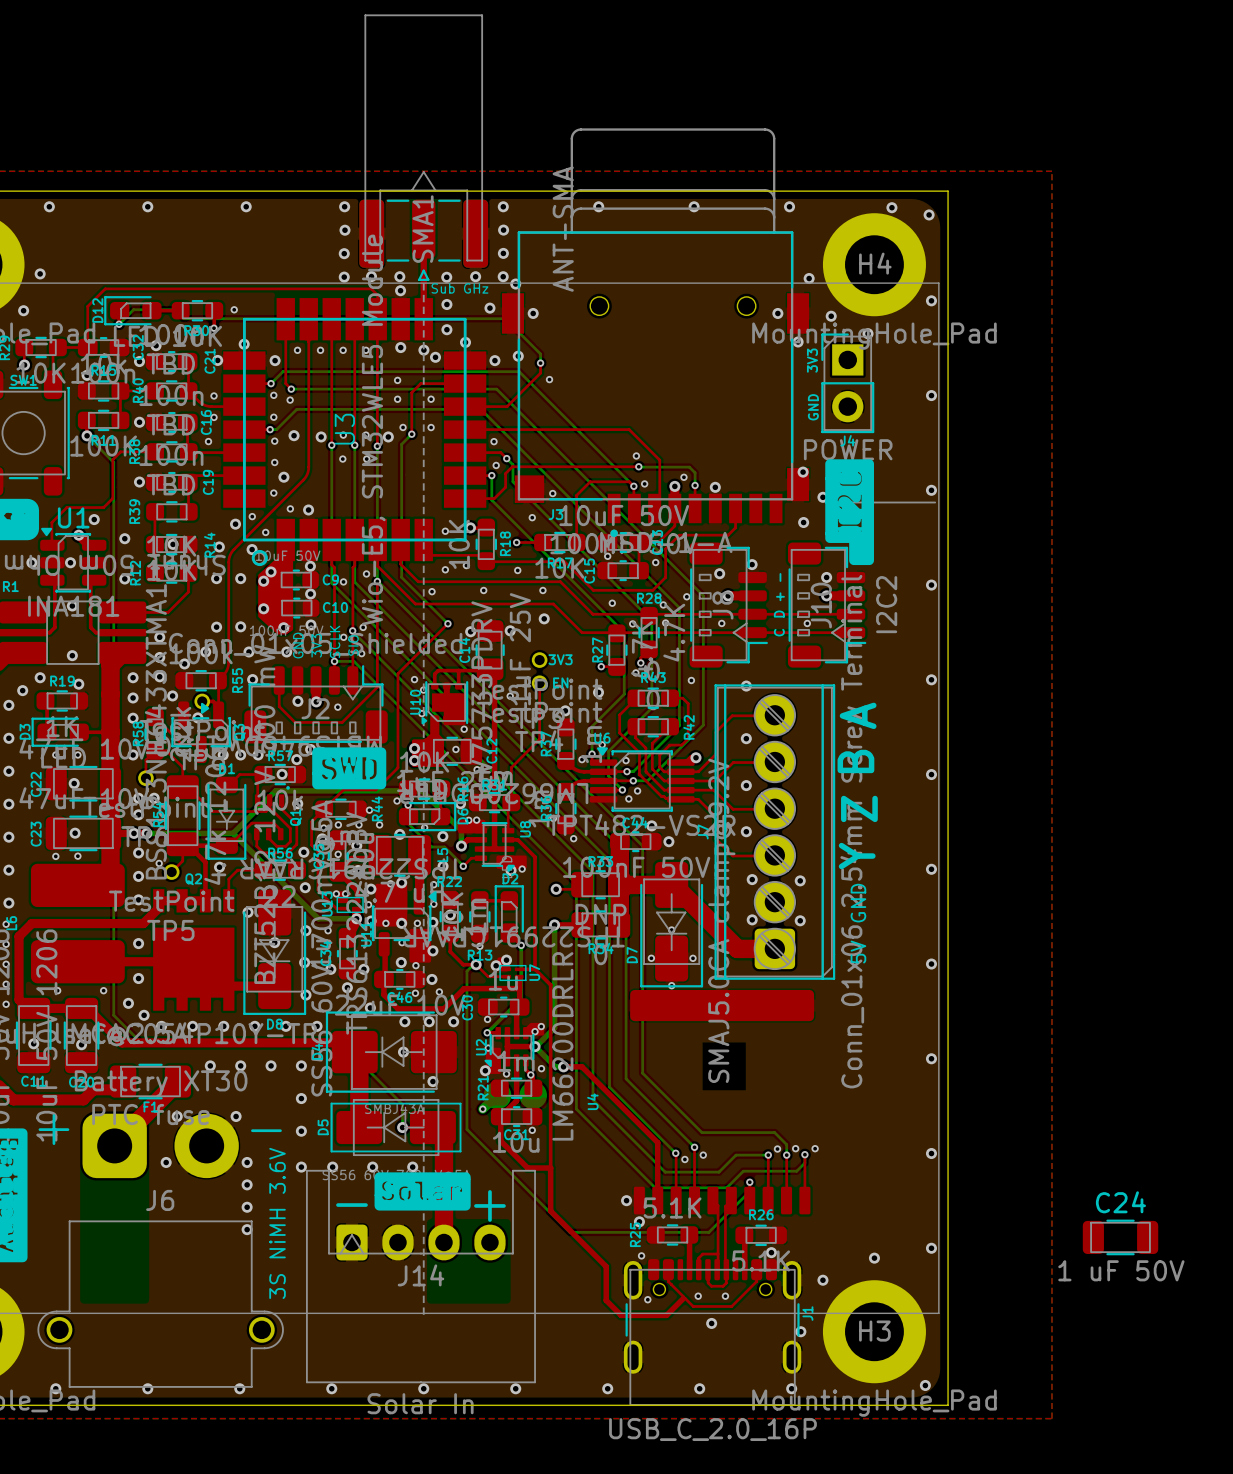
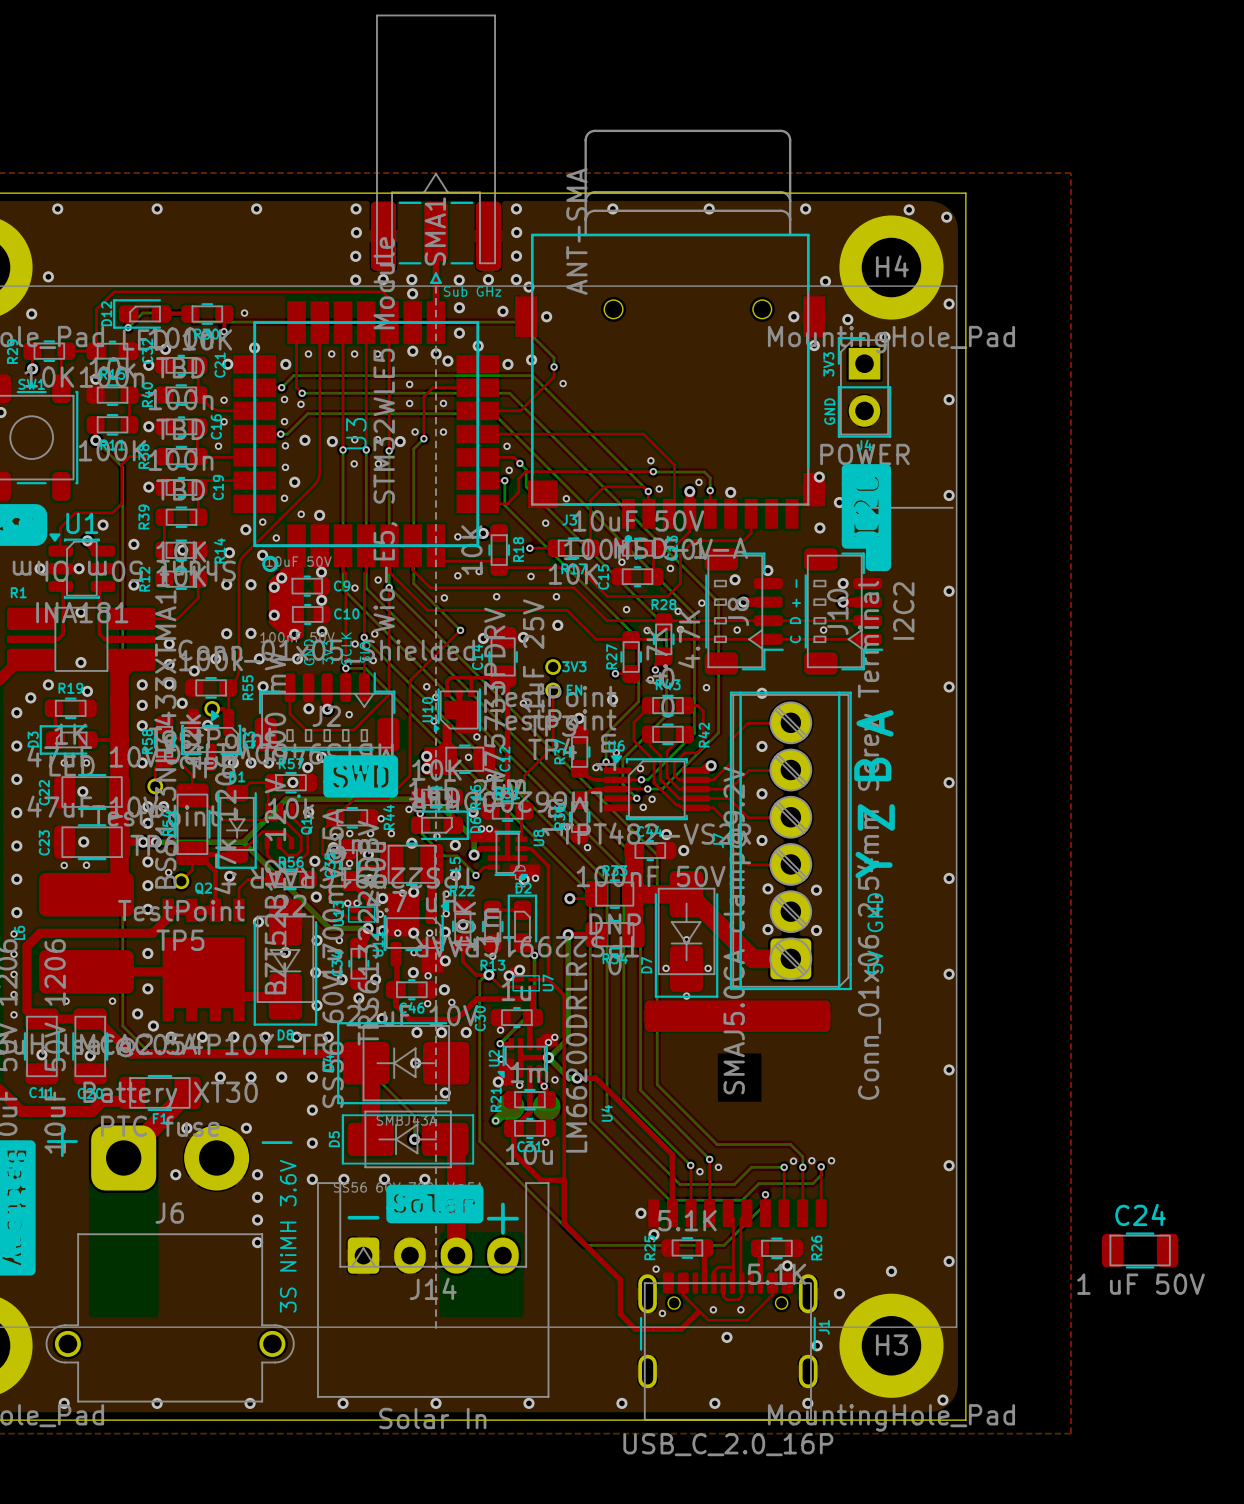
R26 name rotation: 0° (761, 1214) -> 90° counterclockwise (816, 1247)
R26 name position: R26 (761, 1214) -> R26 (816, 1247)

